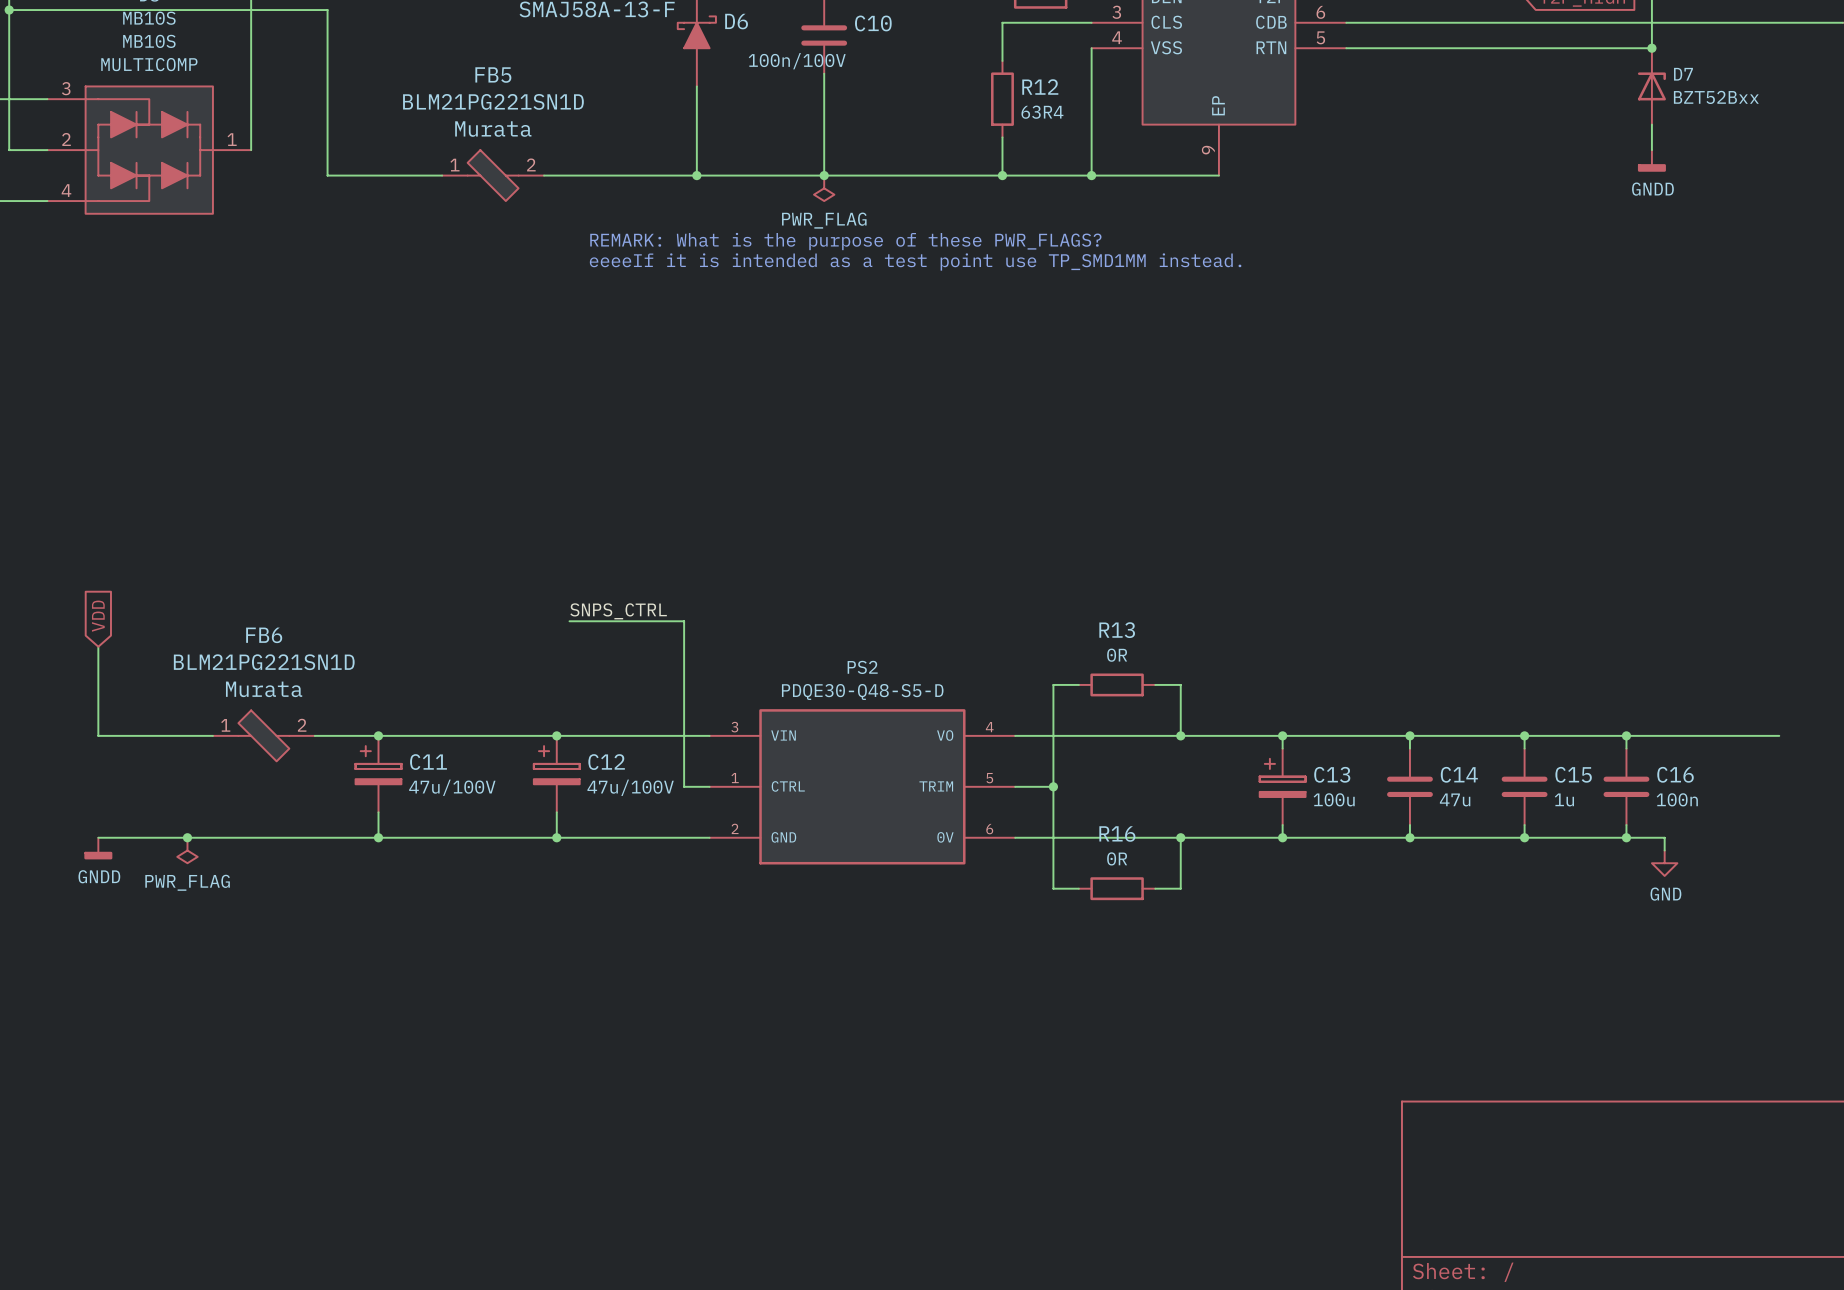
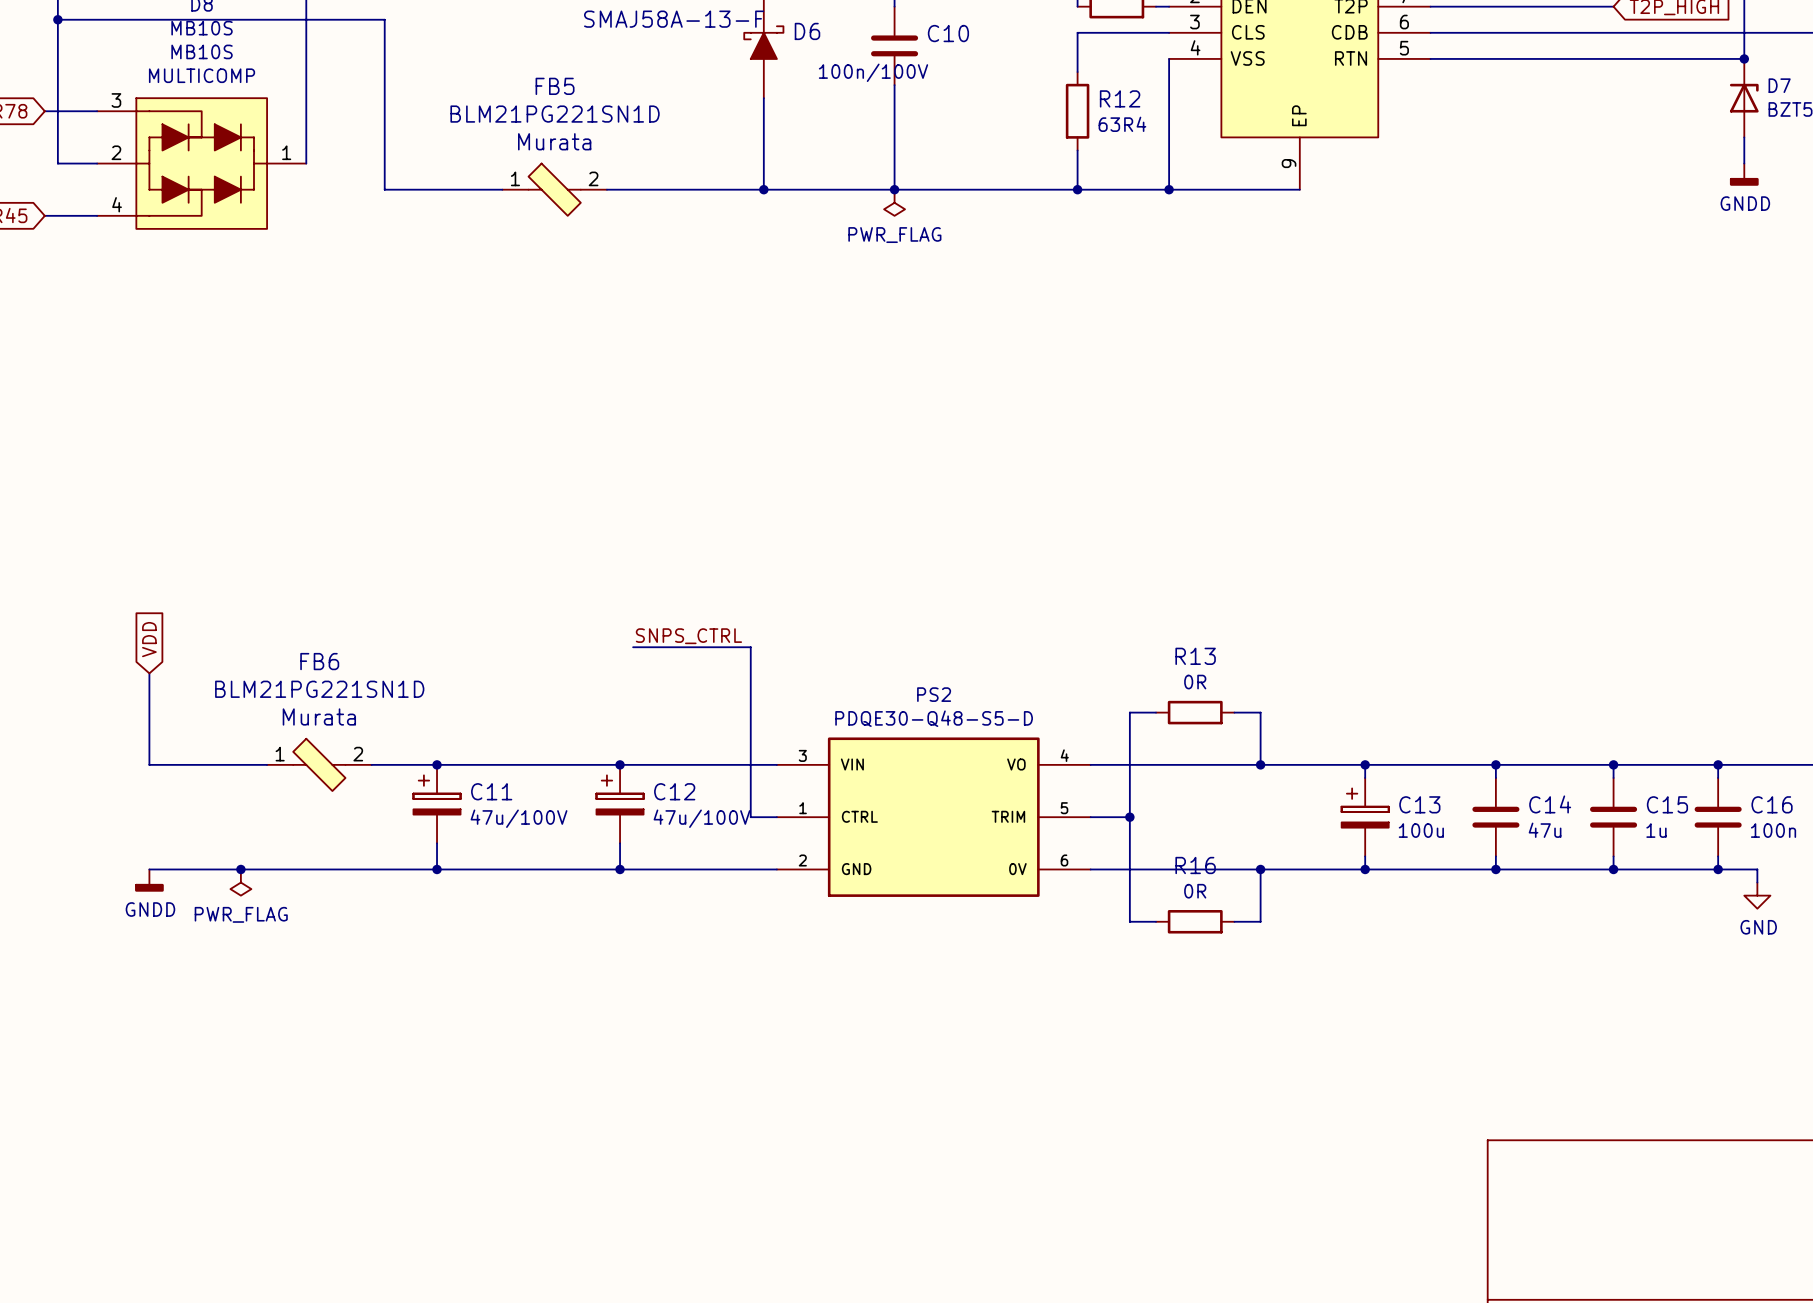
text: REMARK: What is the purpose of these PWR_FLAGS? (845, 241) -> none
text: eeeeIf it is intended as a test point use TP_SMD1MM instead. (915, 262) -> none

